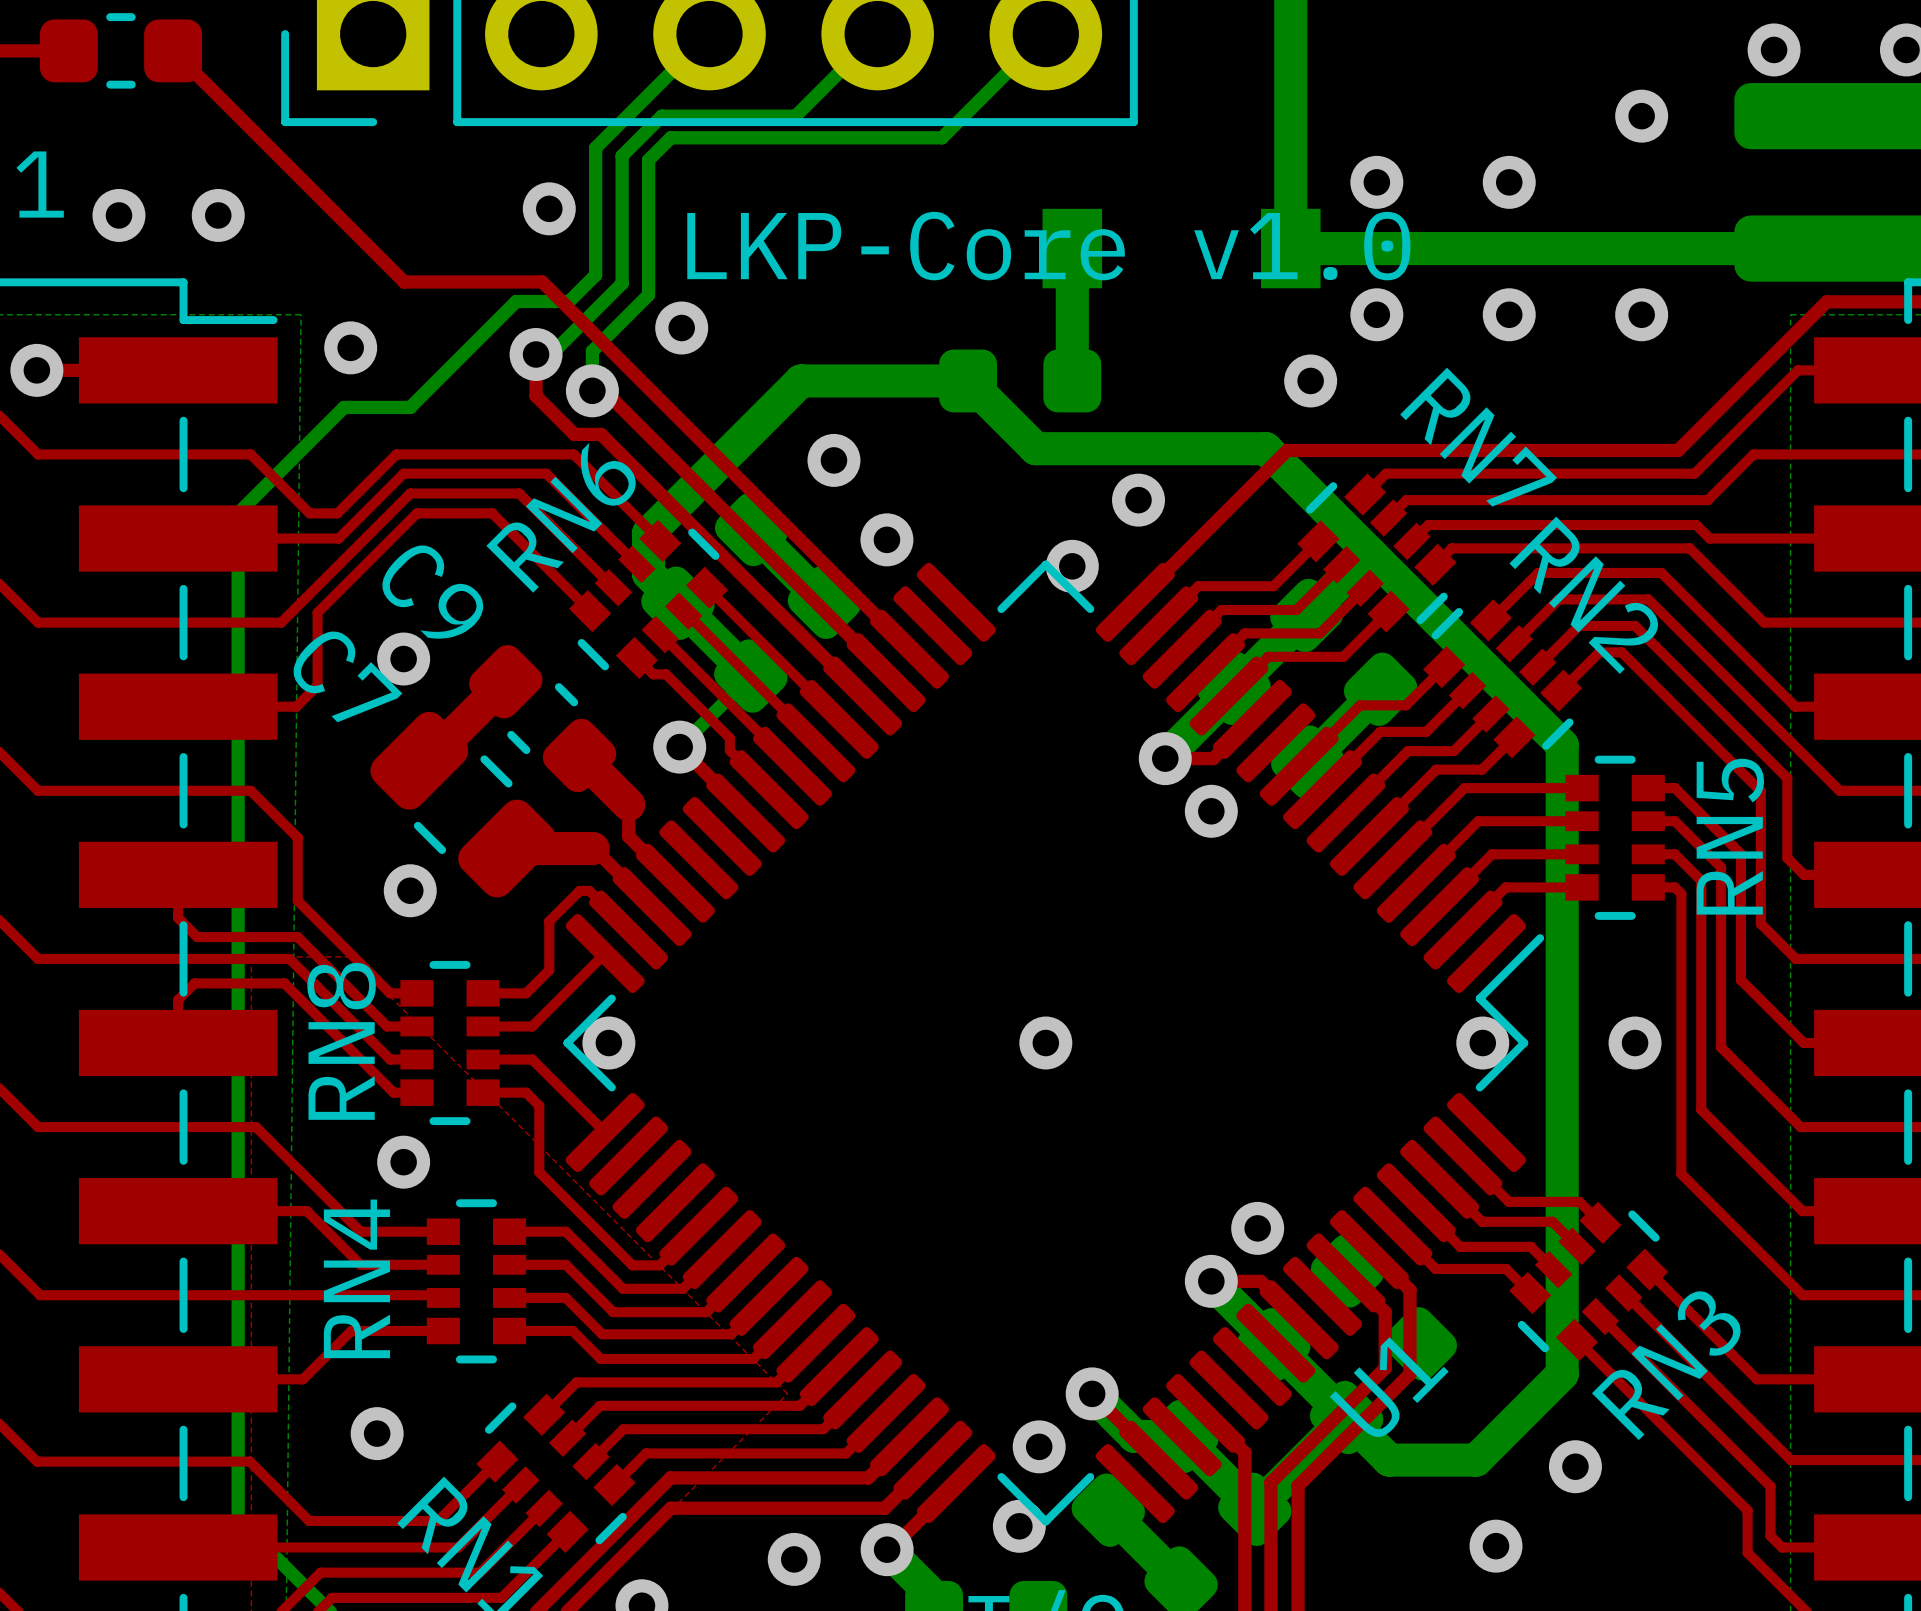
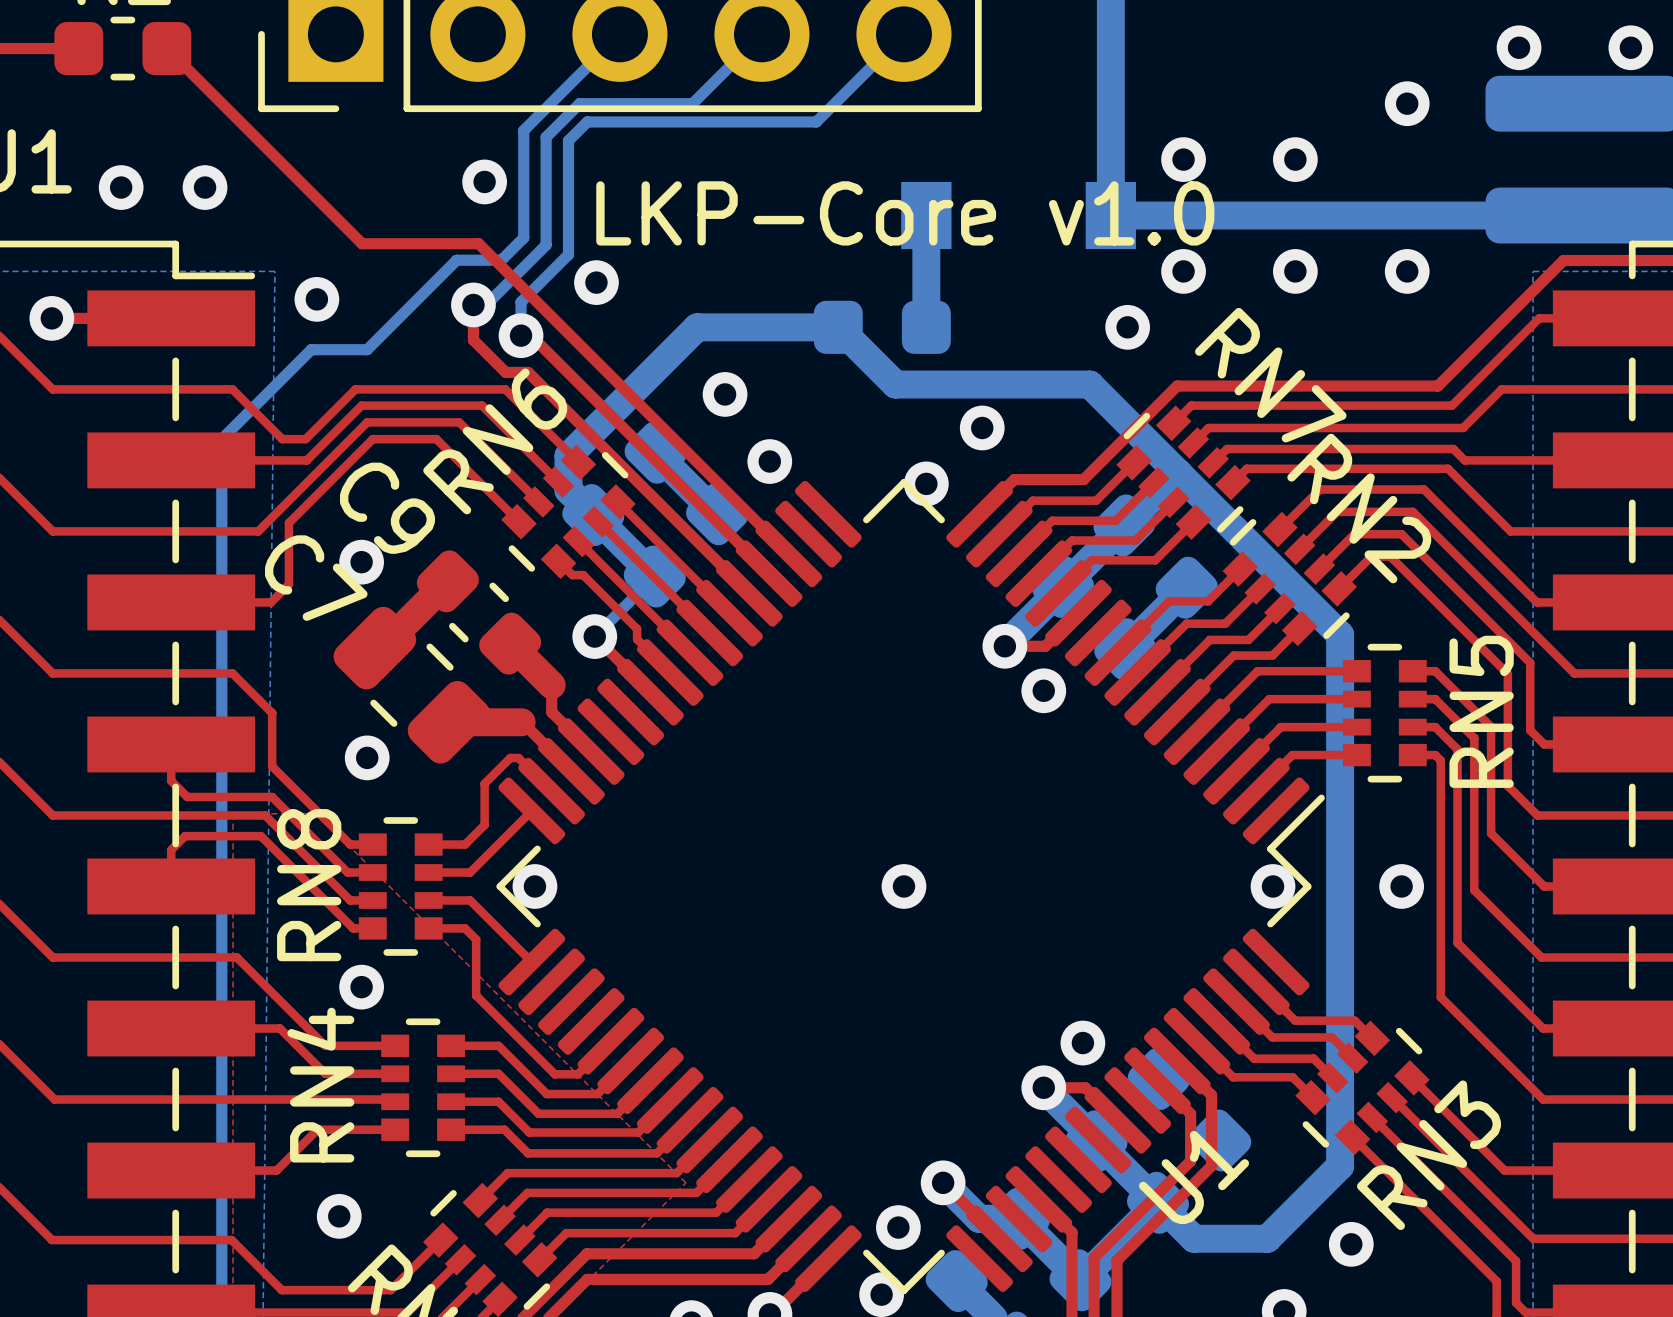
top track: (1369, 450) (1287, 450) (1176, 561) -> (1177, 386) (1083, 479) (1014, 479)

